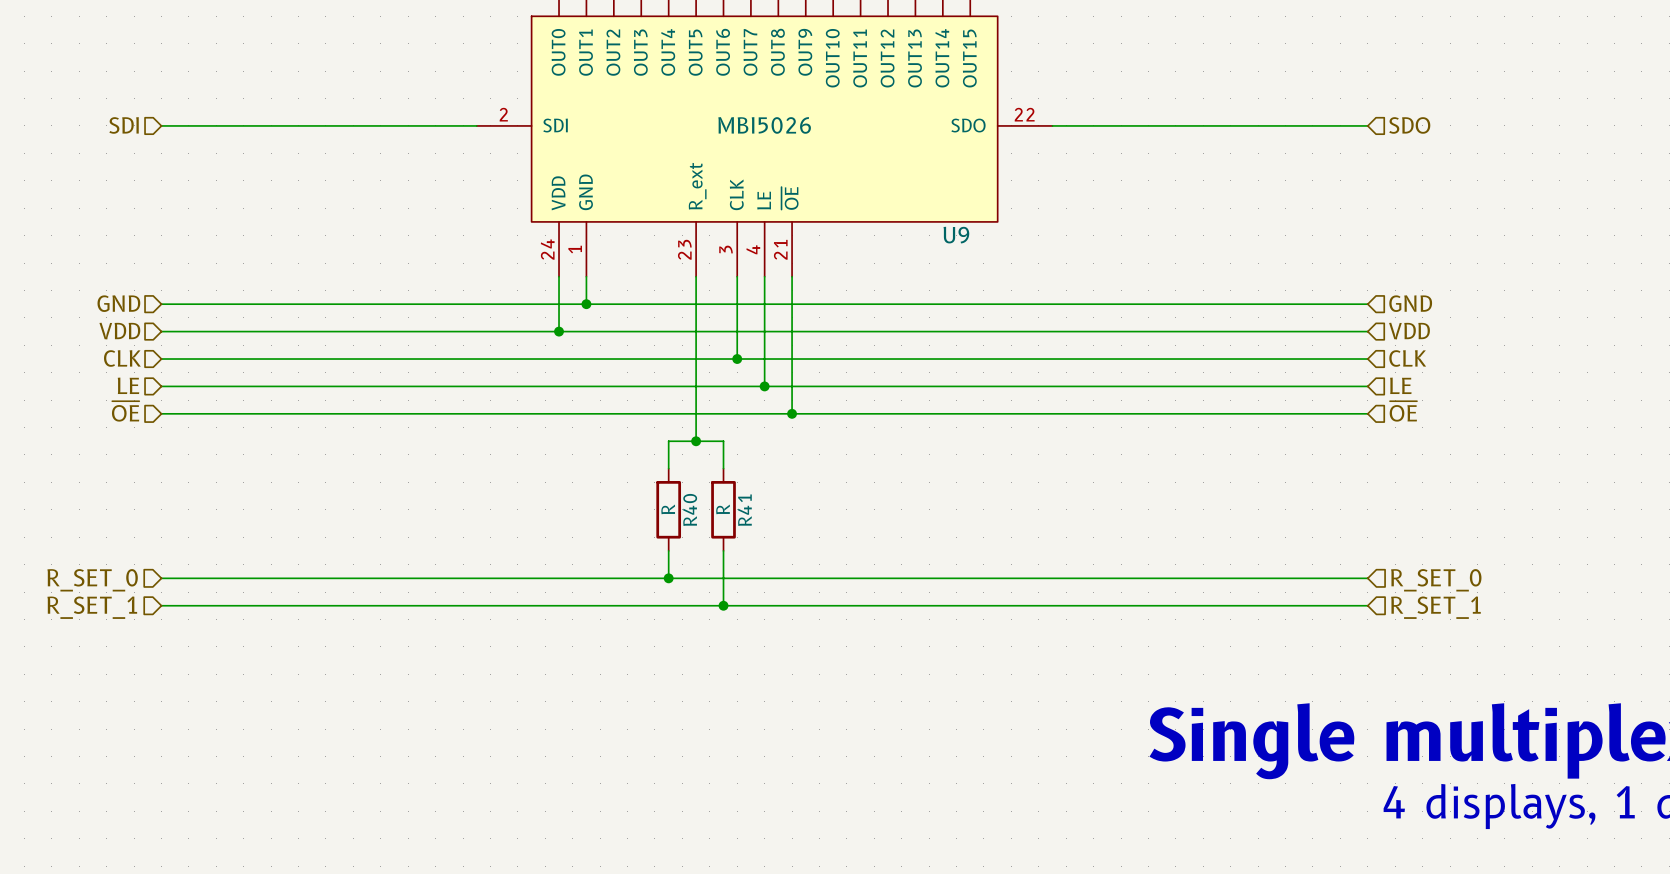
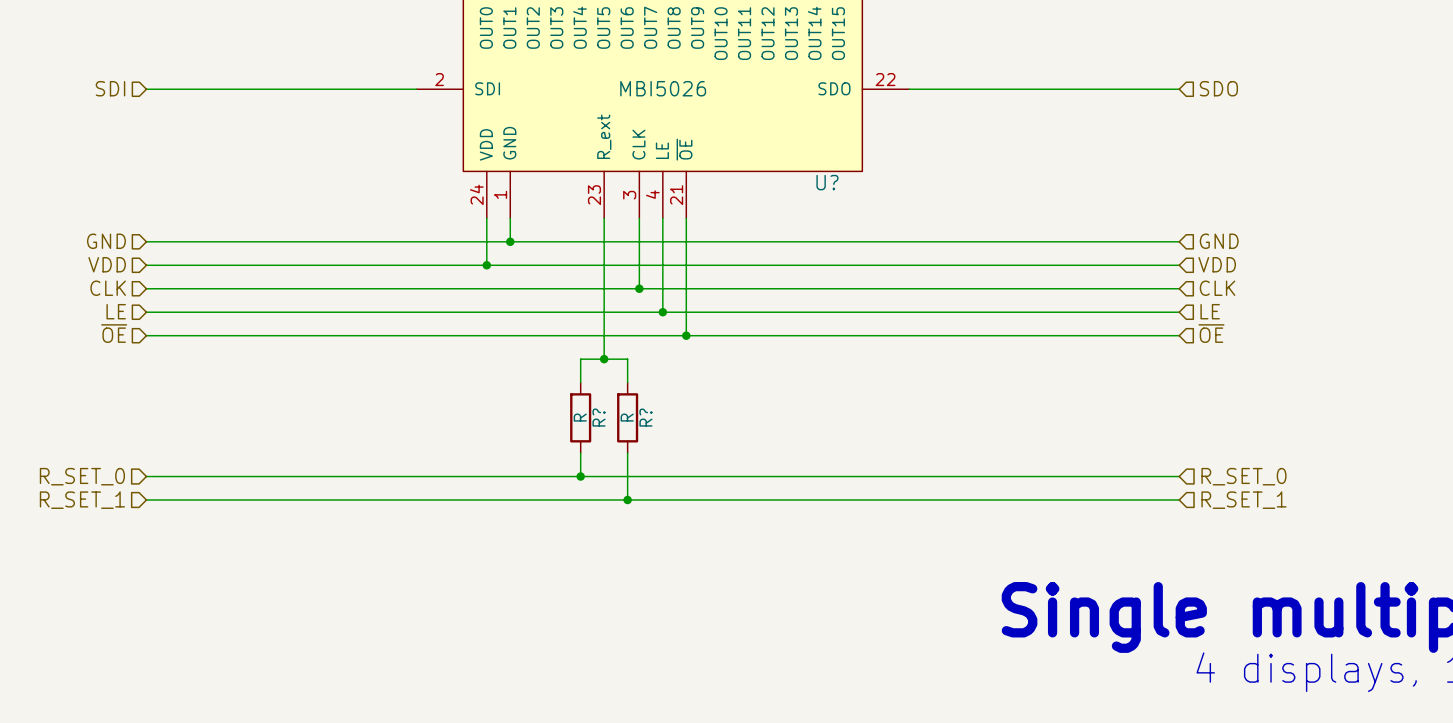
U9 name: U9 (956, 235) -> U? (827, 182)
R40 name: R40 (690, 509) -> R? (599, 417)
R41 name: R41 (744, 510) -> R? (645, 417)

